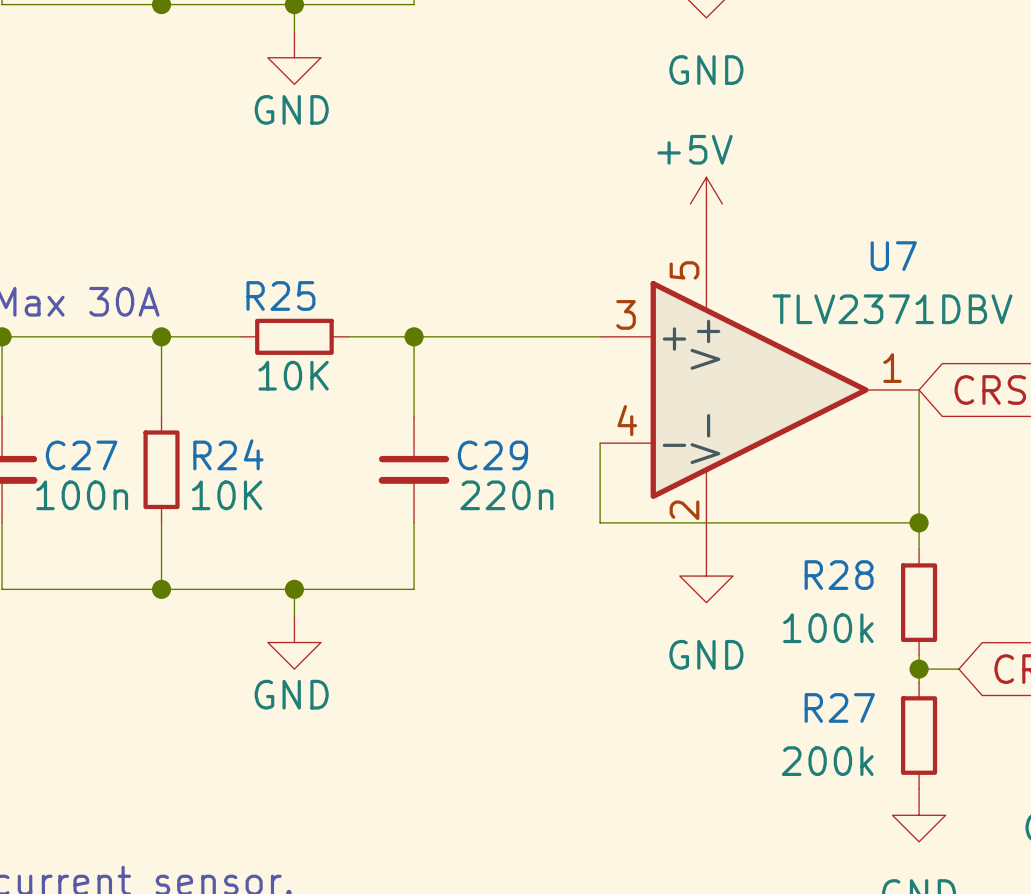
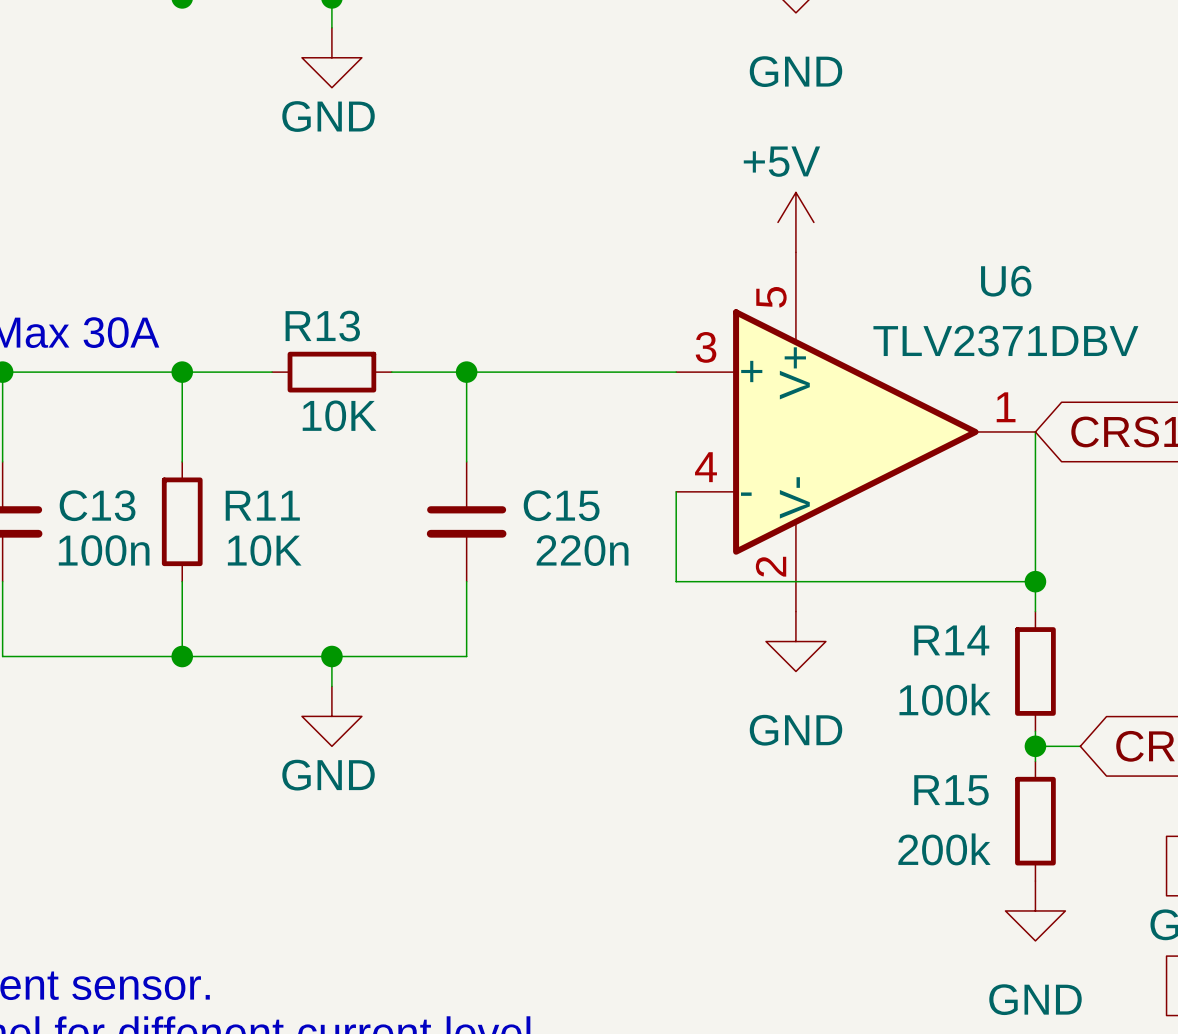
U7 name: U7 (893, 256) -> U6 (1006, 281)
R25 name: R25 (280, 295) -> R13 (322, 326)
R24 name: R24 (228, 454) -> R11 (262, 505)
C27 name: C27 (81, 455) -> C13 (97, 505)
C29 name: C29 (492, 455) -> C15 (561, 505)
R28 name: R28 (839, 575) -> R14 (951, 640)
R27 name: R27 (839, 707) -> R15 (951, 790)

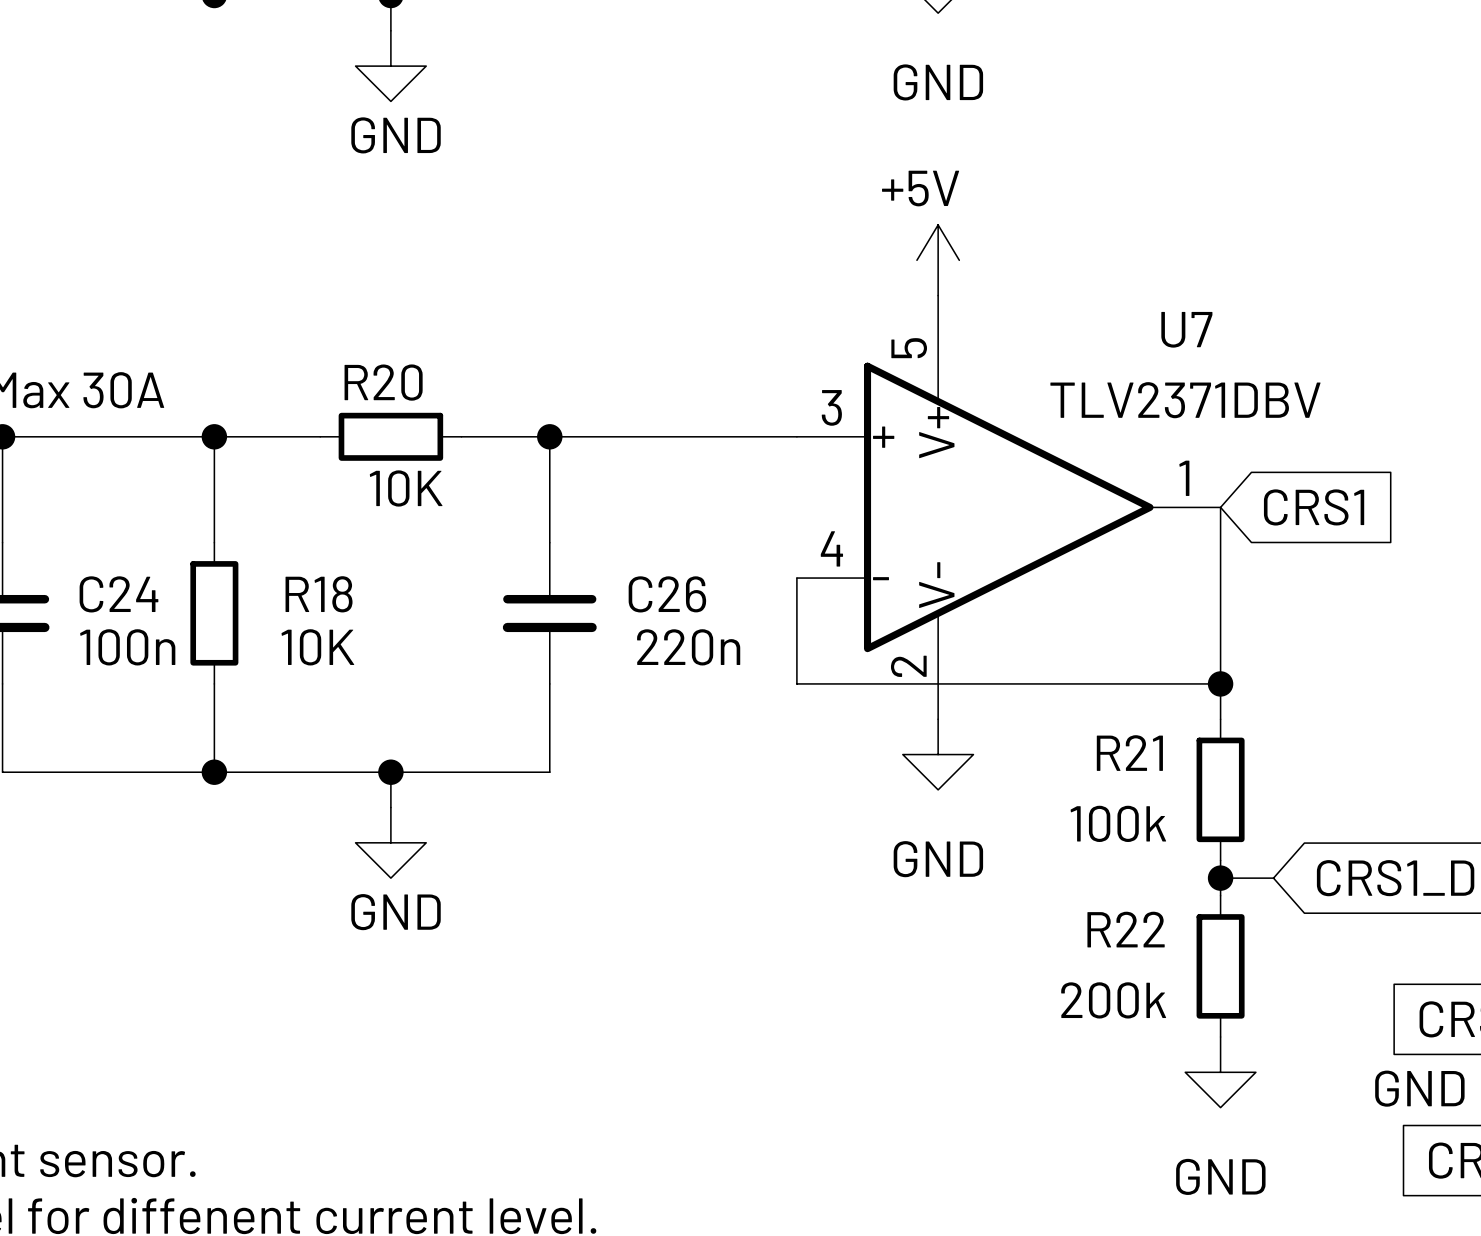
U6 name: U6 (1006, 281) -> U7 (1186, 329)
R13 name: R13 (322, 326) -> R20 (383, 382)
C13 name: C13 (97, 505) -> C24 (118, 594)
R11 name: R11 (262, 505) -> R18 (319, 594)
C15 name: C15 (561, 505) -> C26 (667, 594)
R14 name: R14 (951, 640) -> R21 (1129, 753)
R15 name: R15 (951, 790) -> R22 (1126, 929)

